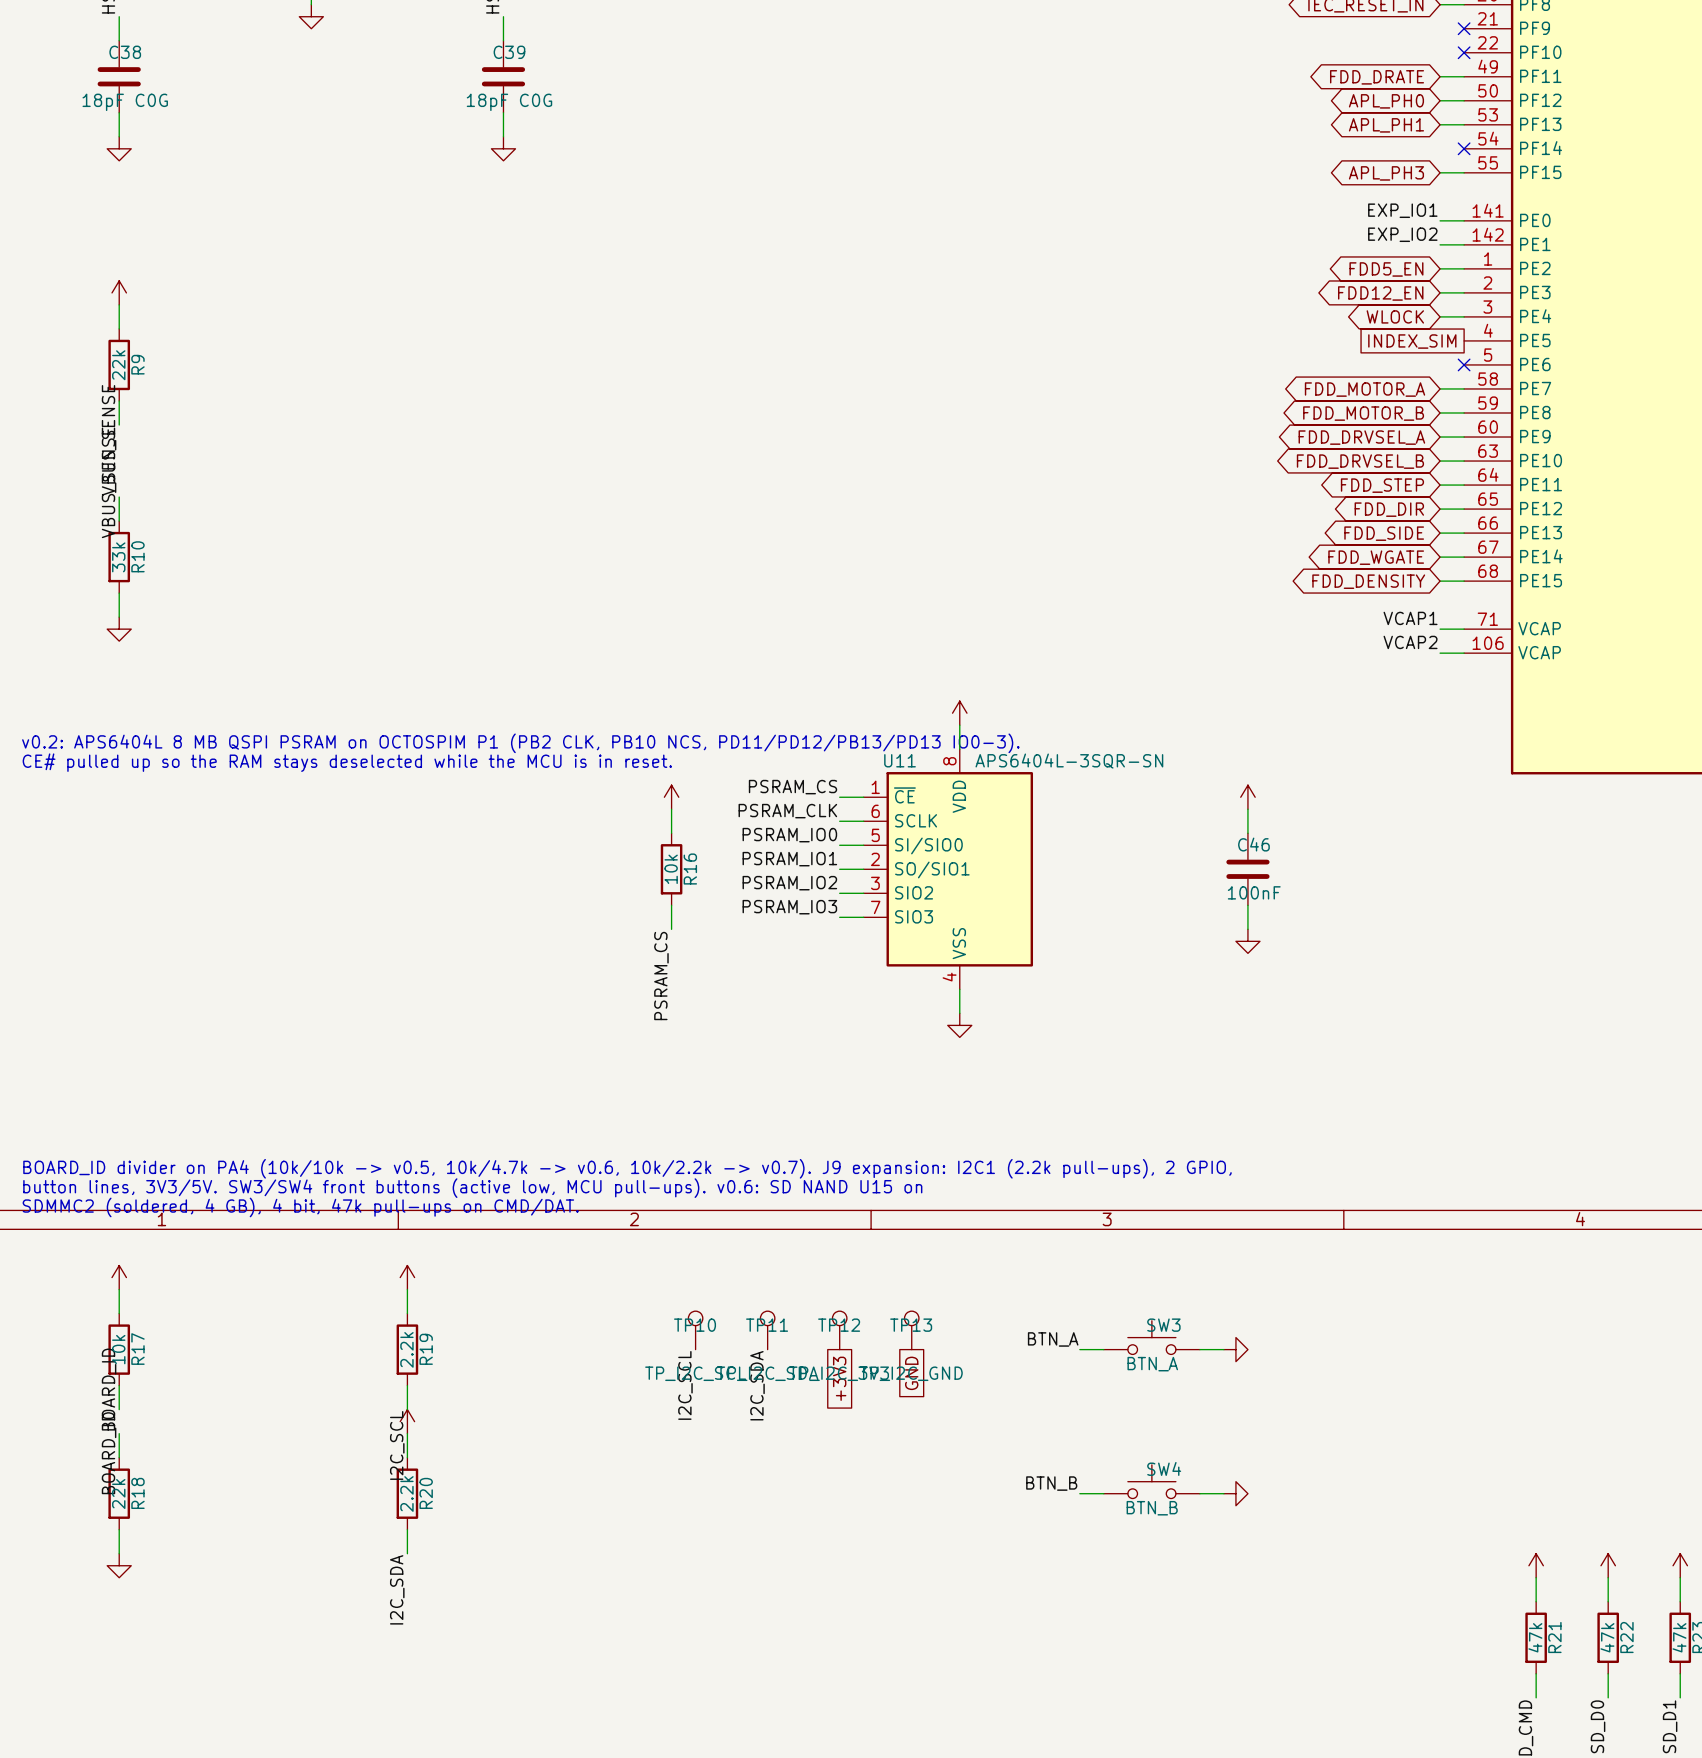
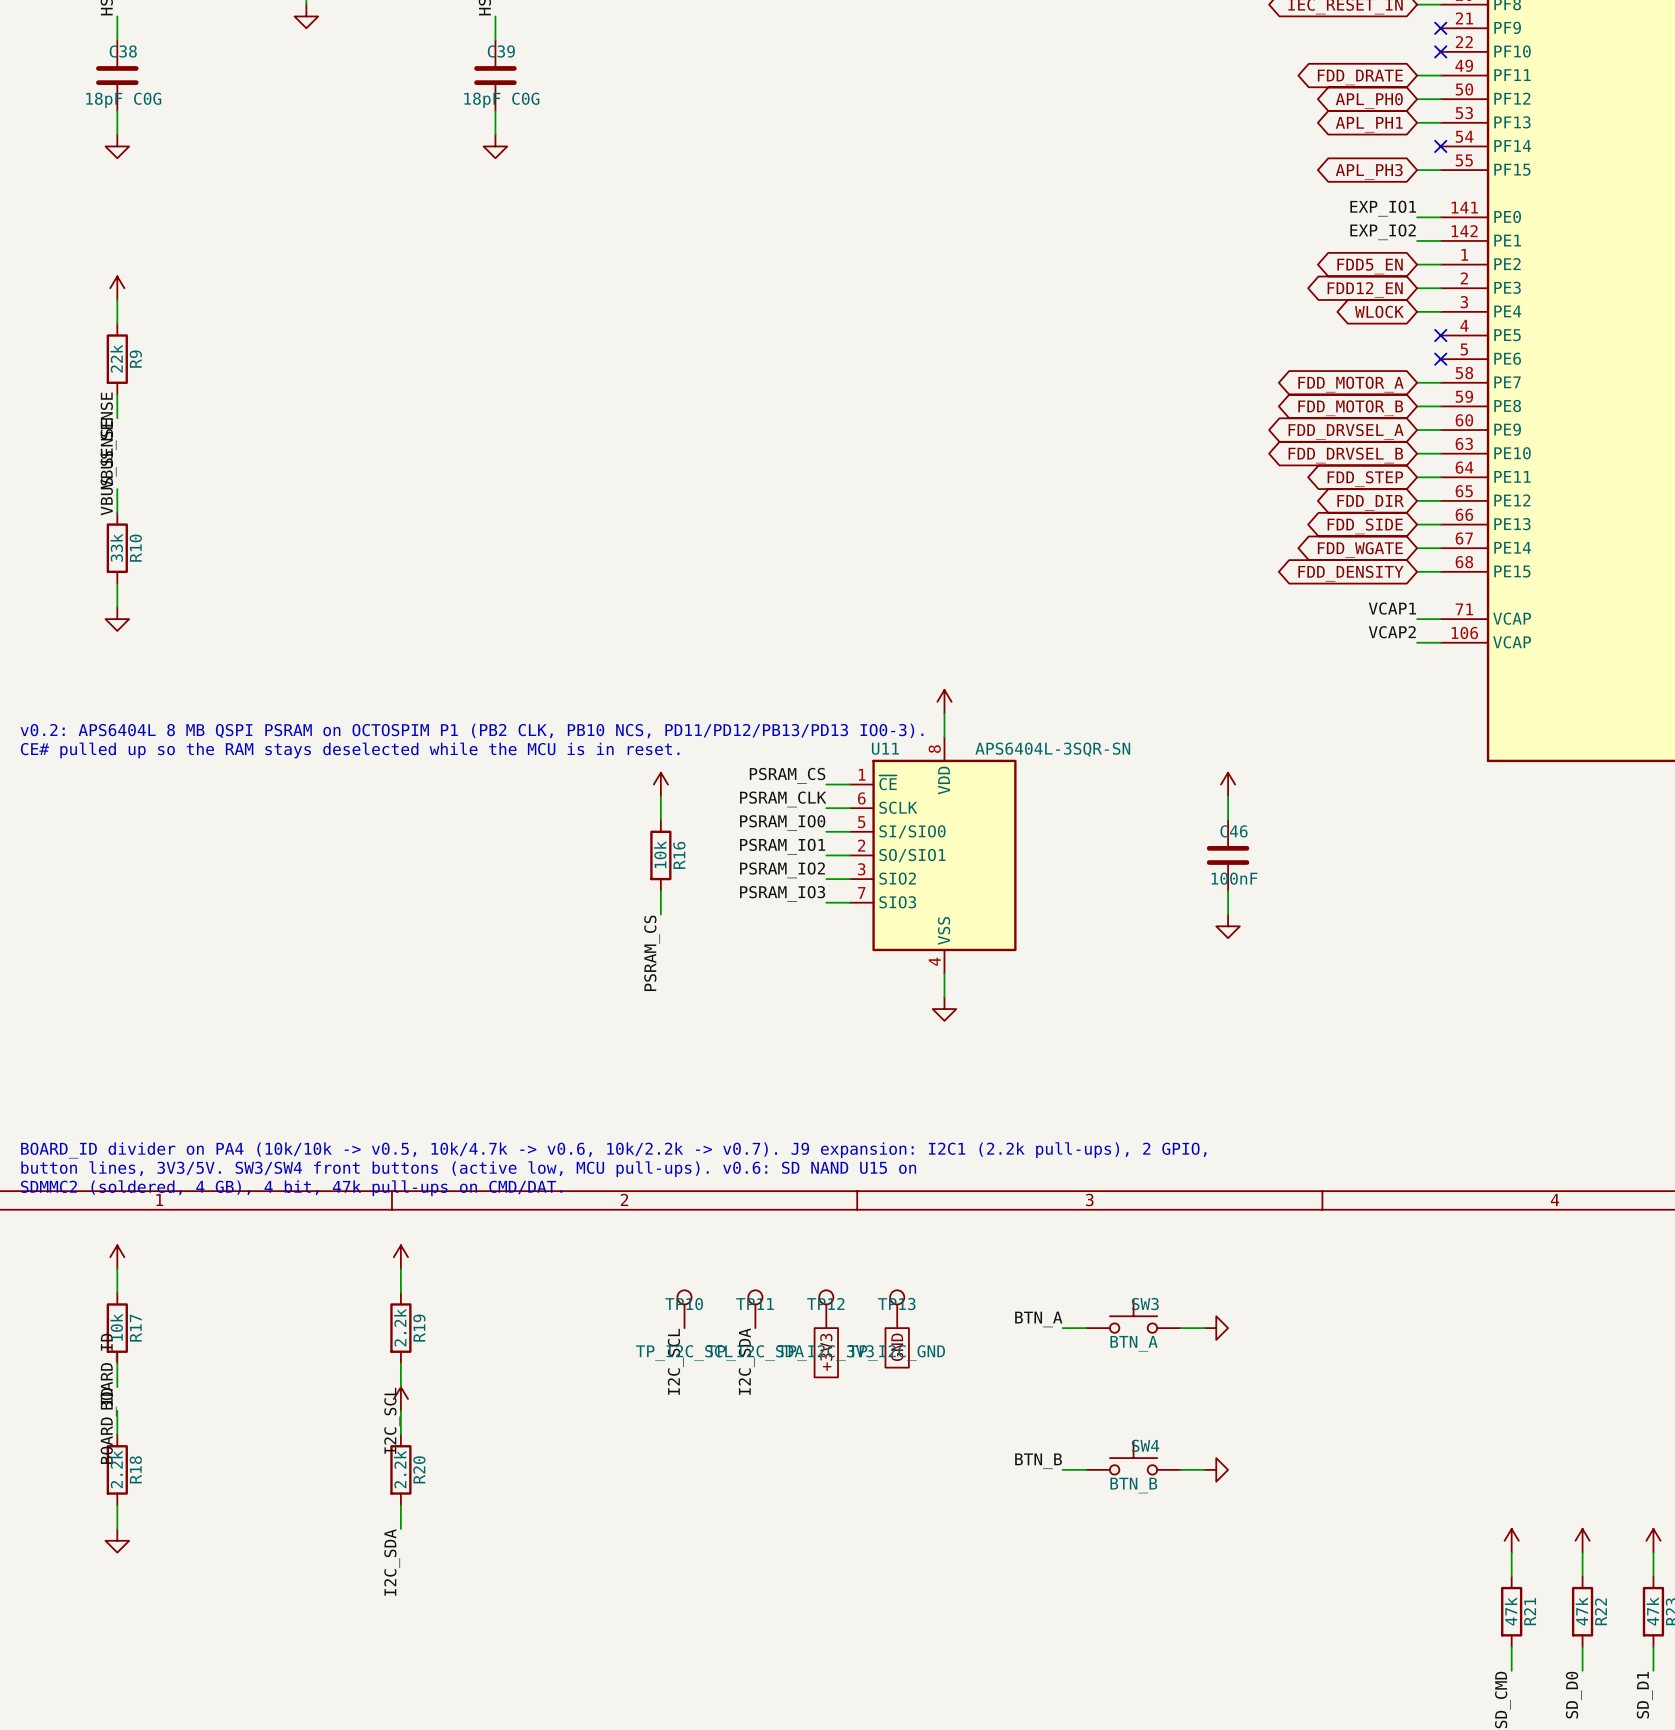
no-connect mark: none -> (1440, 335)
global label: INDEX_SIM (1412, 341) -> none
R18 value: 22k (118, 1493) -> 2.2k (116, 1469)

